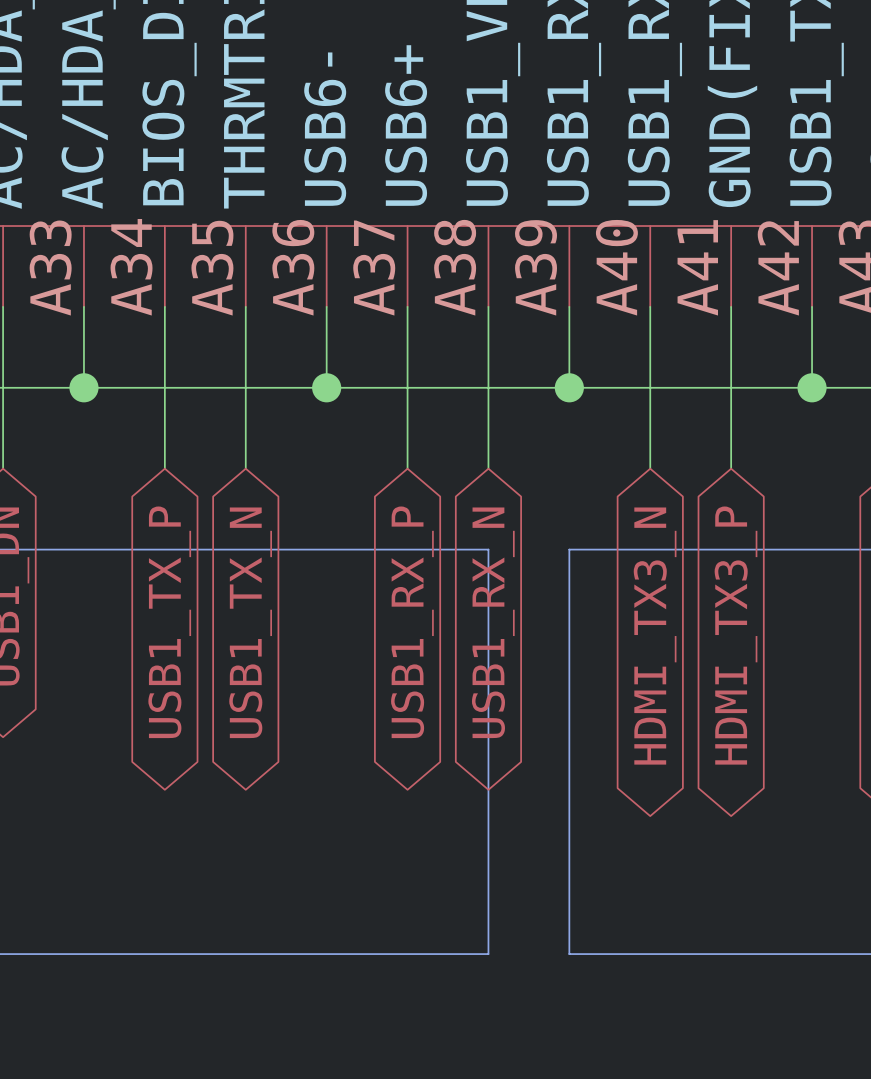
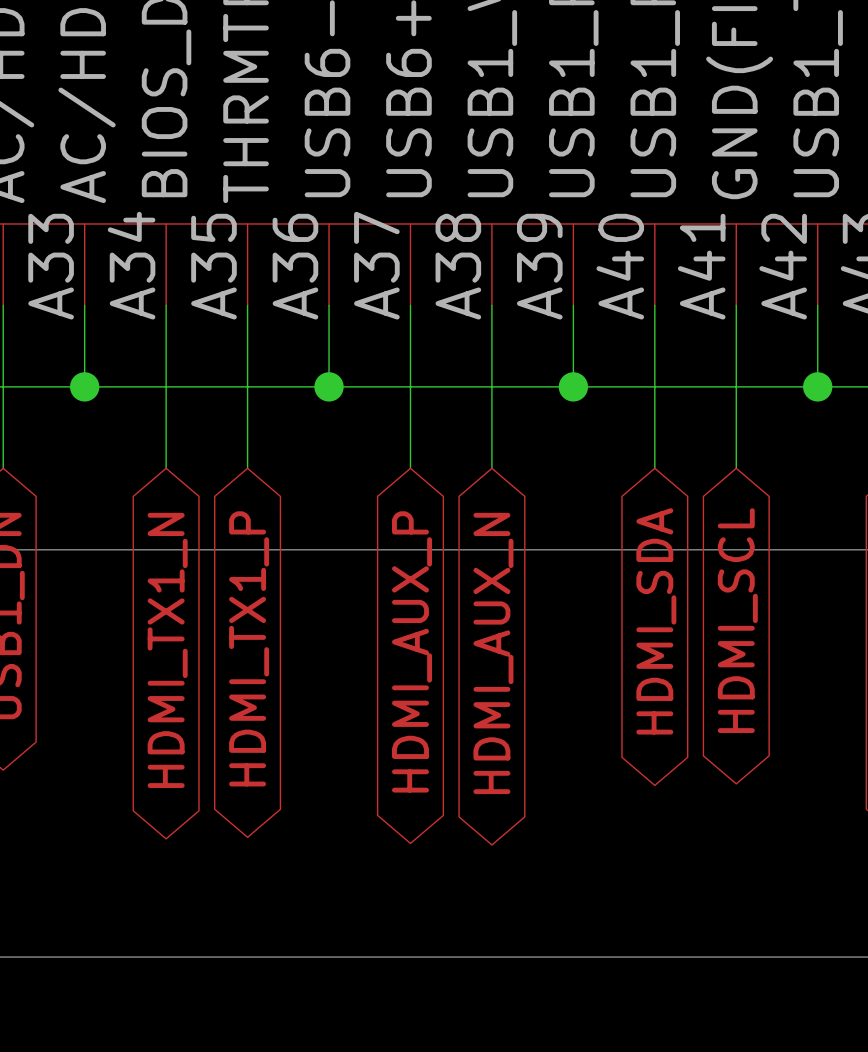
line: (488, 549) (488, 954) -> (491, 549) (573, 549)
line: (569, 549) (569, 954) -> (491, 957) (573, 957)
global label: USB1_TX_P (169, 622) -> HDMI_TX1_N (167, 650)
global label: USB1_TX_N (250, 622) -> HDMI_TX1_P (249, 648)
global label: USB1_RX_P (412, 622) -> HDMI_AUX_P (412, 651)
global label: USB1_RX_N (493, 622) -> HDMI_AUX_N (493, 653)
global label: HDMI_TX3_P (736, 635) -> HDMI_SCL (737, 620)
global label: HDMI_TX3_N (655, 636) -> HDMI_SDA (656, 621)

